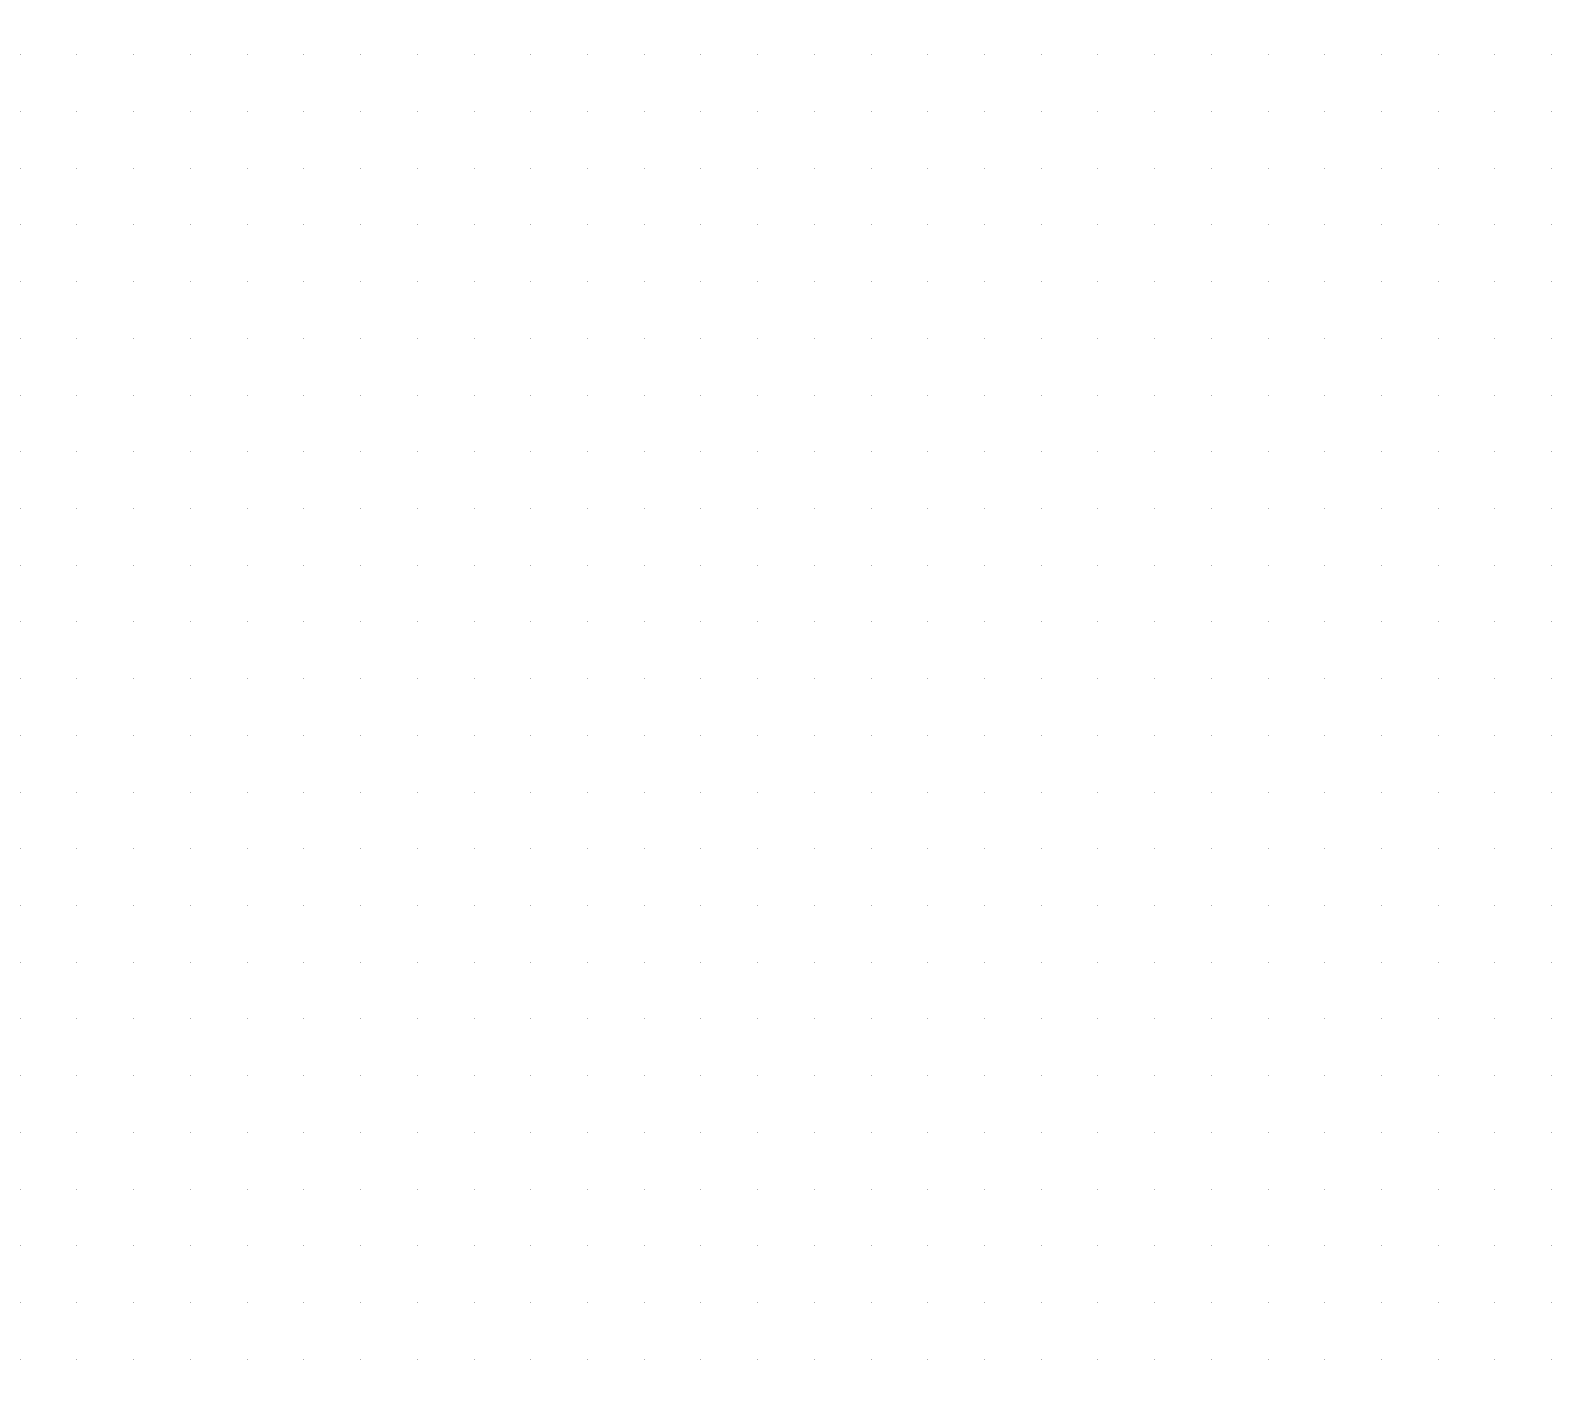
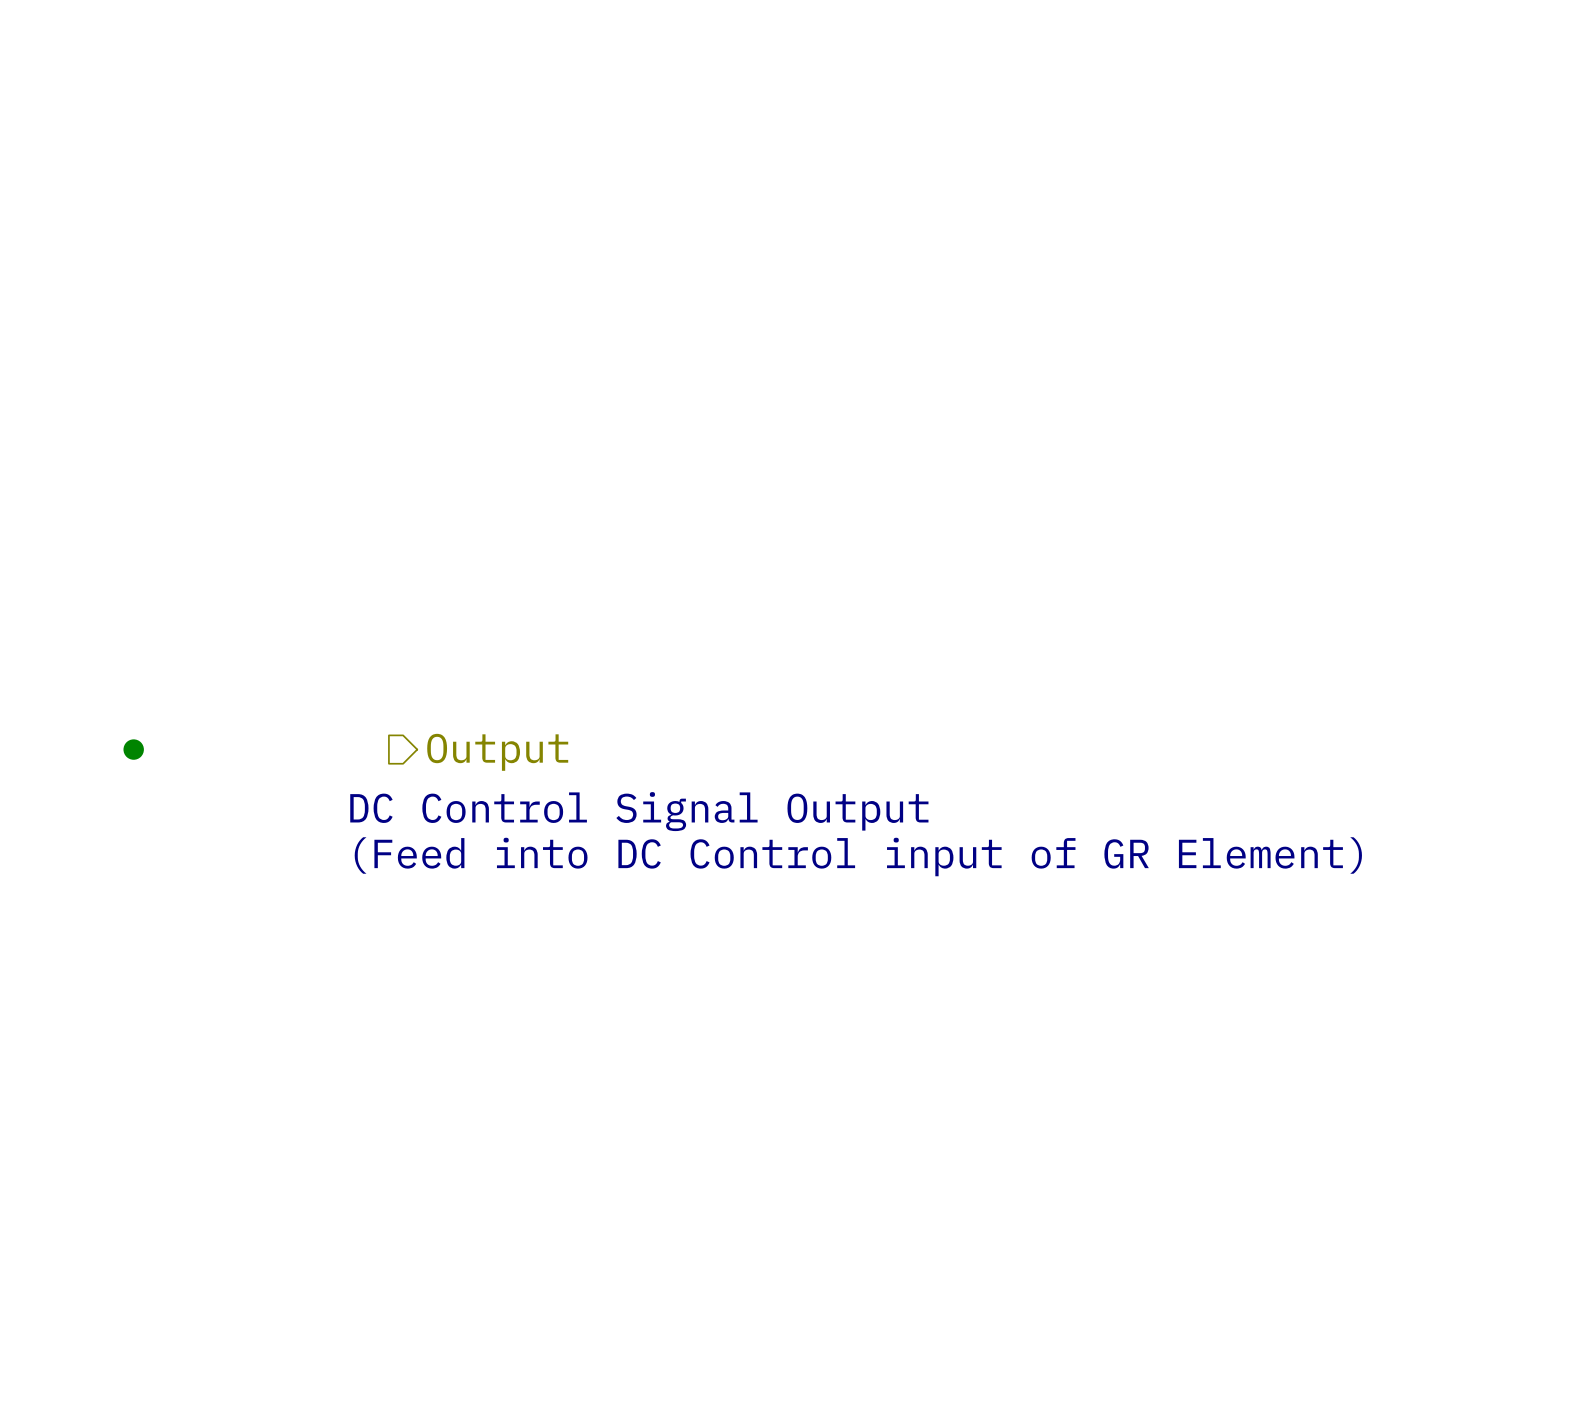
junction: none -> (133, 749)
hierarchical label: none -> Output (497, 752)
text: none -> DC Control Signal Output (639, 811)
text: none -> (Feed into DC Control input of GR Element) (858, 856)

